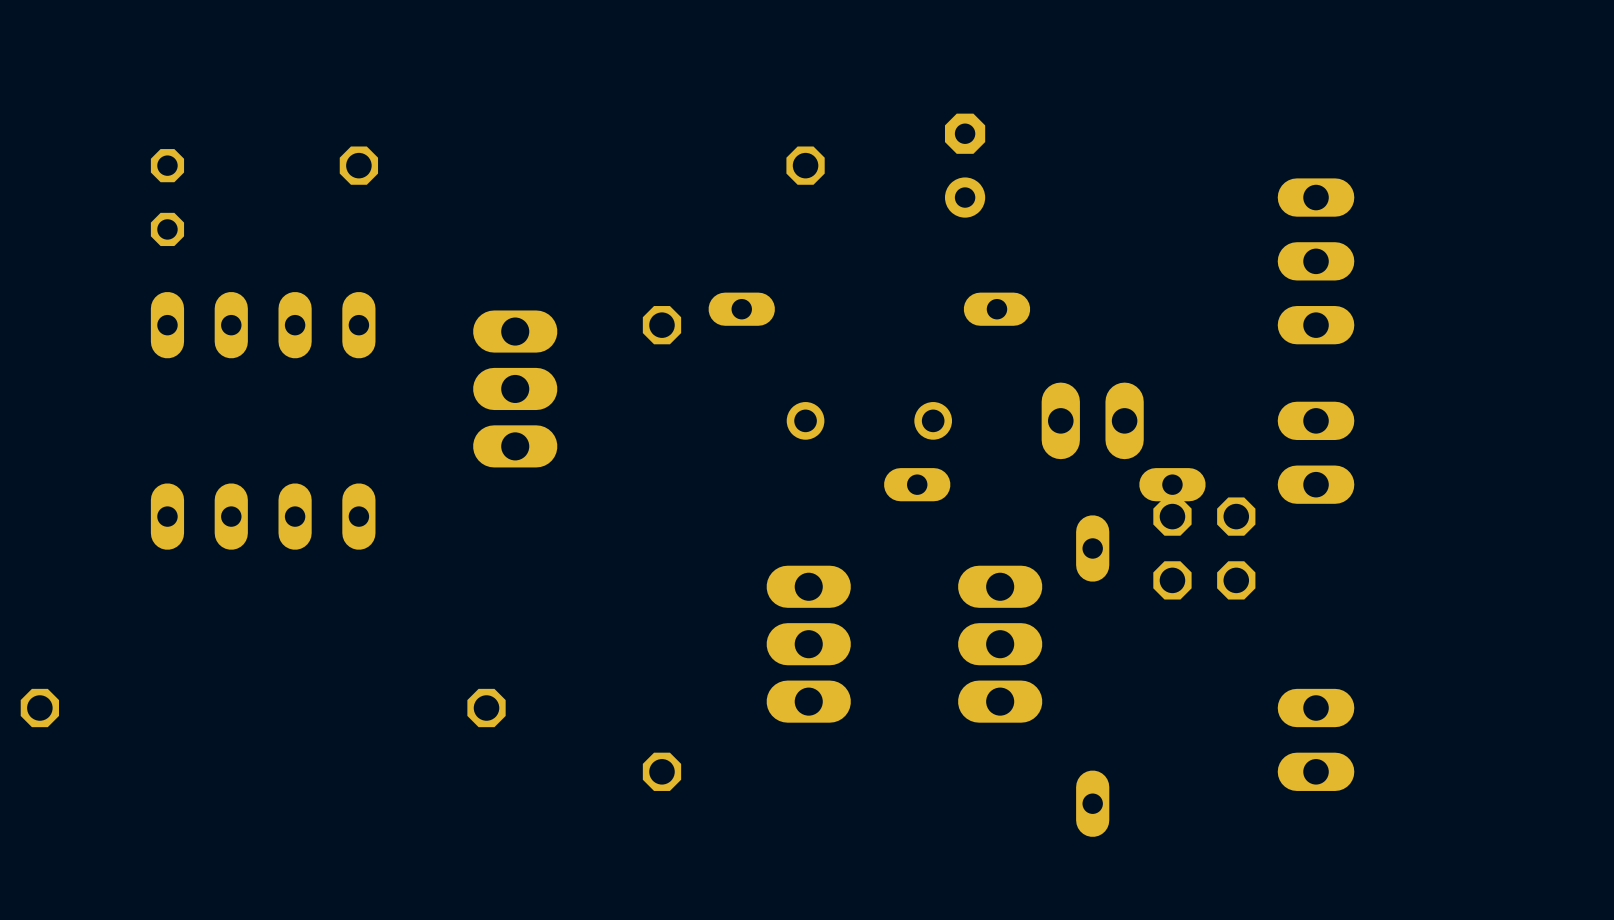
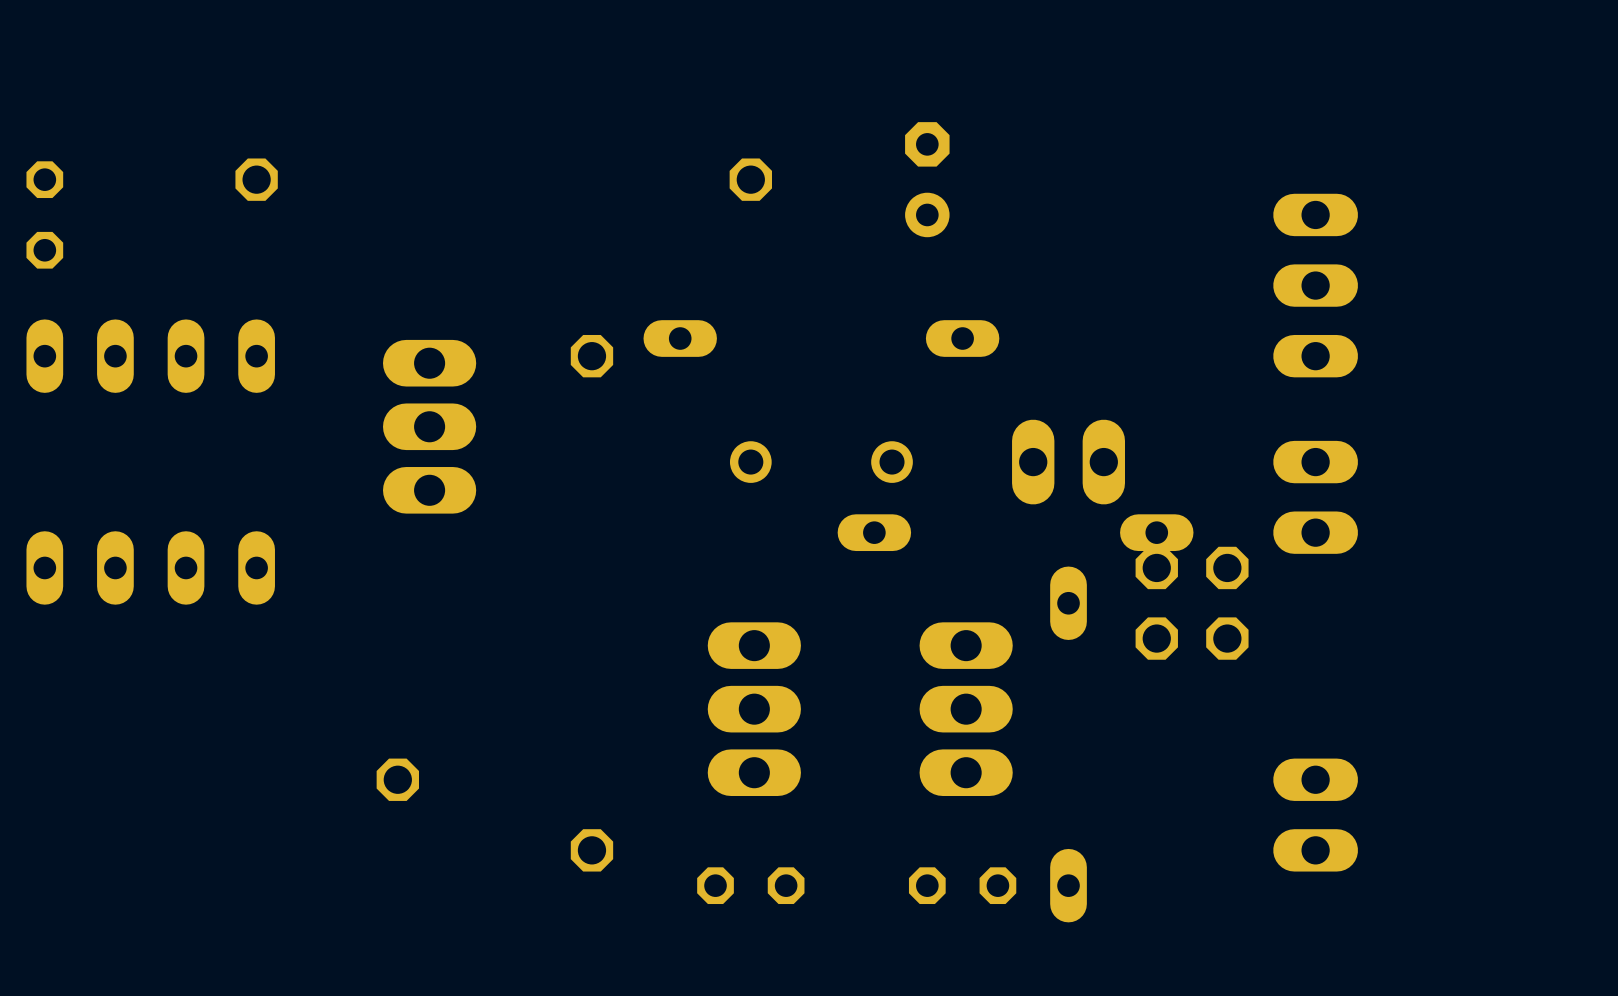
part: none -> (750, 885)
part: none -> (962, 885)

